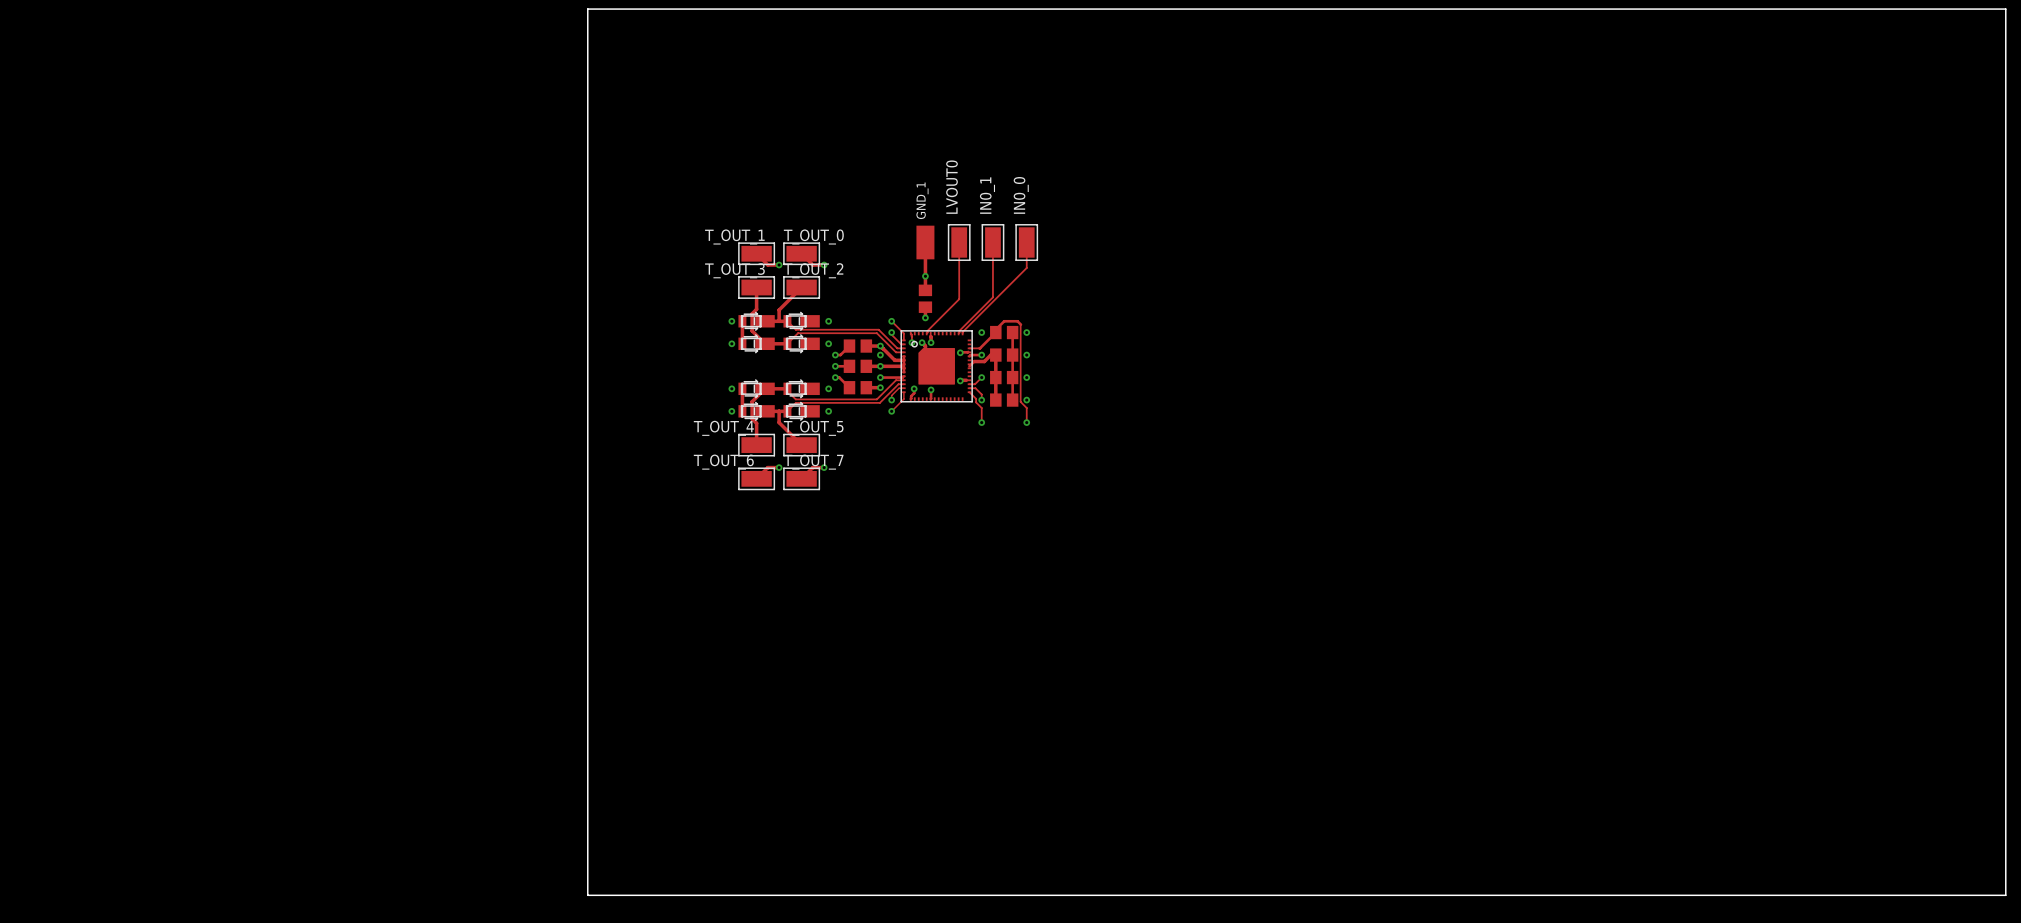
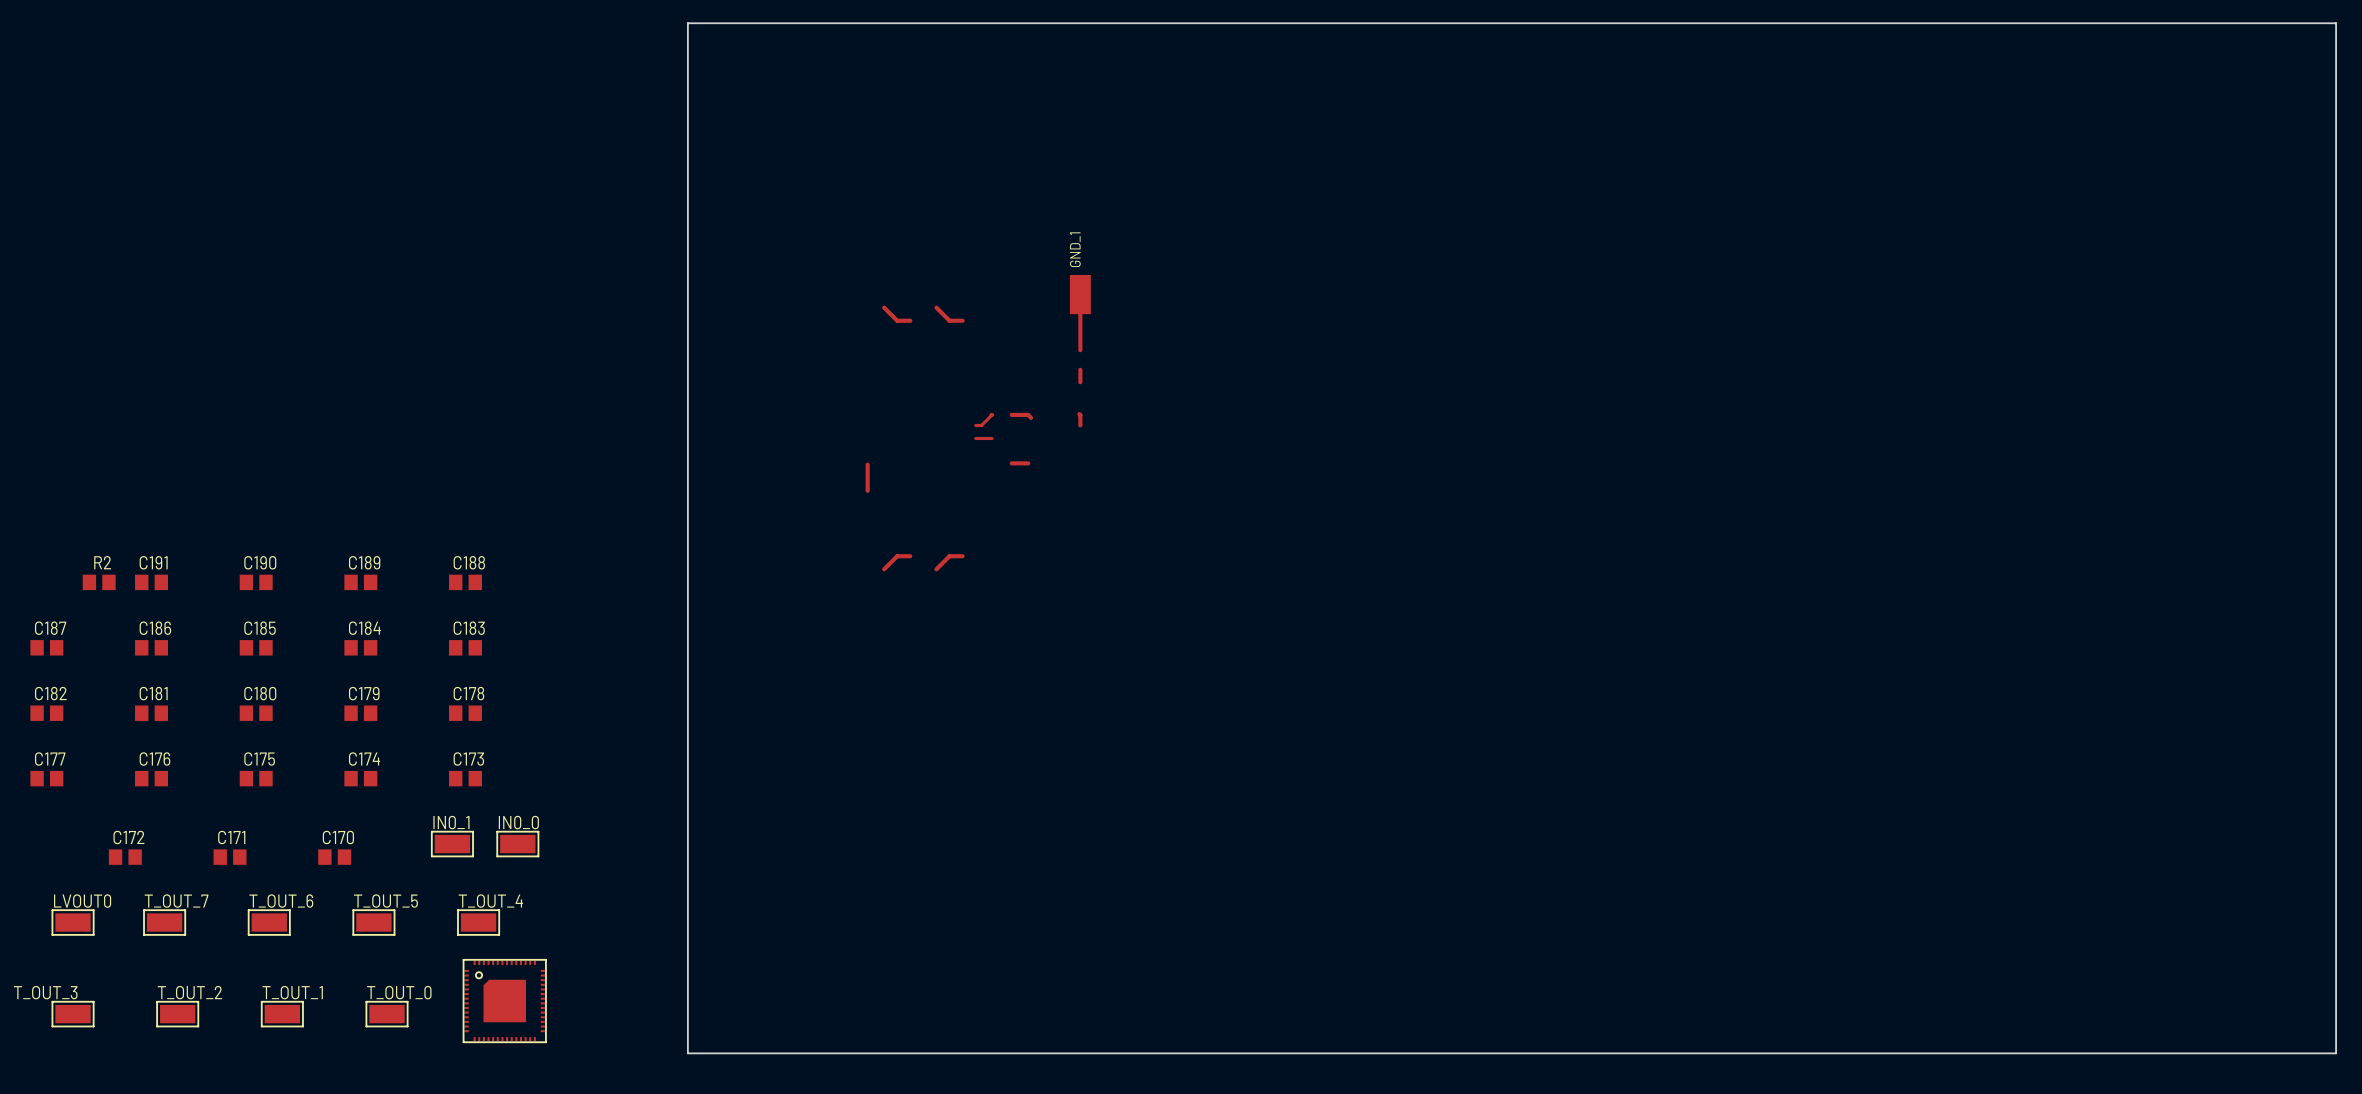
LVOUT0 name position: LVOUT0 (951, 187) -> LVOUT0 (82, 901)
IN0_1 name position: IN0_1 (987, 195) -> IN0_1 (451, 822)
IN0_0 name position: IN0_0 (1021, 195) -> IN0_0 (518, 822)
T_OUT_1 name position: T_OUT_1 (734, 236) -> T_OUT_1 (292, 992)
track: (959, 242) (959, 299) (926, 333) -> none
LVOUT0 rotation: 0° (959, 242) -> 90° clockwise (73, 922)
LVOUT0 position: (959, 242) -> (73, 922)
track: (992, 242) (992, 297) (958, 333) -> none
IN0_1 rotation: 0° (992, 242) -> 90° clockwise (452, 844)
IN0_1 position: (992, 242) -> (452, 844)
track: (1026, 242) (1026, 267) (962, 333) -> none
IN0_0 rotation: 0° (1026, 242) -> 90° clockwise (517, 844)
IN0_0 position: (1026, 242) -> (517, 844)
T_OUT_1 position: (756, 253) -> (282, 1014)
T_OUT_0 position: (801, 253) -> (387, 1014)
via: (779, 265) -> none
via: (824, 265) -> none
via: (925, 276) -> none
track: (756, 287) (756, 309) (752, 313) (752, 330) (765, 343) (787, 343) (798, 333) (876, 333) (896, 352) (903, 352) -> none
T_OUT_3 position: (756, 287) -> (73, 1014)
track: (801, 287) (779, 310) (779, 321) -> none
T_OUT_2 position: (801, 287) -> (177, 1014)
part: (925, 298) -> none
via: (925, 317) -> none
via: (731, 321) -> none
track: (742, 321) (742, 343) -> none
part: (756, 321) -> none
track: (765, 321) (787, 321) (795, 329) (878, 329) (897, 348) (903, 348) -> none
part: (801, 321) -> none
via: (828, 321) -> none
track: (891, 321) (903, 333) (903, 340) -> none
via: (891, 321) -> none
track: (1020, 324) (1017, 321) (1004, 321) (995, 329) (995, 332) -> none
track: (1020, 324) (1020, 401) (1026, 407) (1026, 422) -> none
track: (891, 332) (901, 344) (903, 344) -> none
via: (891, 332) -> none
via: (981, 332) -> none
track: (995, 332) (979, 348) (969, 348) -> none
part: (1004, 332) -> none
track: (1012, 332) (1012, 400) -> none
via: (1026, 332) -> none
track: (910, 333) (911, 342) -> none
track: (930, 336) (931, 342) -> none
via: (911, 342) -> none
via: (922, 342) -> none
via: (931, 342) -> none
via: (731, 343) -> none
part: (756, 343) -> none
part: (801, 343) -> none
via: (828, 343) -> none
part: (857, 346) -> none
via: (880, 346) -> none
track: (883, 348) (894, 360) (903, 360) -> none
track: (968, 351) (960, 352) -> none
via: (960, 352) -> none
via: (835, 355) -> none
via: (880, 355) -> none
track: (981, 355) (969, 356) -> none
via: (981, 355) -> none
part: (1004, 355) -> none
via: (1026, 355) -> none
track: (903, 356) (903, 372) -> none
via: (835, 366) -> none
part: (857, 366) -> none
track: (866, 366) (901, 366) (903, 368) -> none
via: (880, 366) -> none
part: (936, 366) -> none
track: (969, 366) (974, 361) (984, 361) (990, 355) (995, 355) (995, 400) -> none
track: (903, 376) (880, 377) -> none
track: (835, 377) (839, 377) (849, 387) -> none
via: (835, 377) -> none
via: (880, 377) -> none
track: (981, 377) (975, 384) (969, 384) -> none
via: (981, 377) -> none
part: (1004, 377) -> none
via: (1026, 377) -> none
track: (903, 380) (896, 380) (876, 399) (795, 399) (787, 388) (765, 388) (752, 401) (752, 418) (756, 423) (756, 445) -> none
via: (960, 380) -> none
track: (966, 380) (960, 380) -> none
track: (903, 384) (898, 384) (879, 402) (795, 402) (787, 411) (765, 411) -> none
part: (857, 387) -> none
via: (880, 387) -> none
via: (731, 388) -> none
part: (756, 388) -> none
part: (801, 388) -> none
via: (828, 388) -> none
track: (903, 388) (899, 388) (891, 395) (891, 400) -> none
track: (914, 388) (910, 399) -> none
via: (914, 388) -> none
track: (969, 388) (975, 388) (981, 394) (981, 400) -> none
track: (931, 389) (930, 399) -> none
via: (931, 389) -> none
track: (903, 392) (903, 399) (891, 411) -> none
track: (969, 392) (981, 407) (981, 422) -> none
via: (891, 400) -> none
via: (981, 400) -> none
part: (1004, 400) -> none
via: (1026, 400) -> none
via: (731, 411) -> none
part: (756, 411) -> none
track: (779, 411) (779, 422) (801, 445) -> none
part: (801, 411) -> none
via: (828, 411) -> none
via: (891, 411) -> none
via: (981, 422) -> none
via: (1026, 422) -> none
T_OUT_4 name position: T_OUT_4 (723, 428) -> T_OUT_4 (490, 901)
T_OUT_4 position: (756, 445) -> (478, 922)
T_OUT_5 position: (801, 445) -> (373, 922)
T_OUT_6 name position: T_OUT_6 (723, 462) -> T_OUT_6 (281, 901)
via: (779, 467) -> none
via: (824, 467) -> none
T_OUT_6 position: (756, 478) -> (269, 922)
T_OUT_7 position: (801, 478) -> (164, 922)
R2: none -> (99, 582)
C191: none -> (151, 582)
C190: none -> (256, 582)
C189: none -> (360, 582)
C188: none -> (465, 582)
C187: none -> (46, 647)
C186: none -> (151, 647)
C185: none -> (256, 647)
C184: none -> (360, 647)
C183: none -> (465, 647)
C182: none -> (46, 713)
C181: none -> (151, 713)
C180: none -> (256, 713)
C179: none -> (360, 713)
C178: none -> (465, 713)
C177: none -> (46, 778)
C176: none -> (151, 778)
C175: none -> (256, 778)
C174: none -> (360, 778)
C173: none -> (465, 778)
C172: none -> (125, 857)
C171: none -> (230, 857)
C170: none -> (334, 857)
part: none -> (504, 1001)

